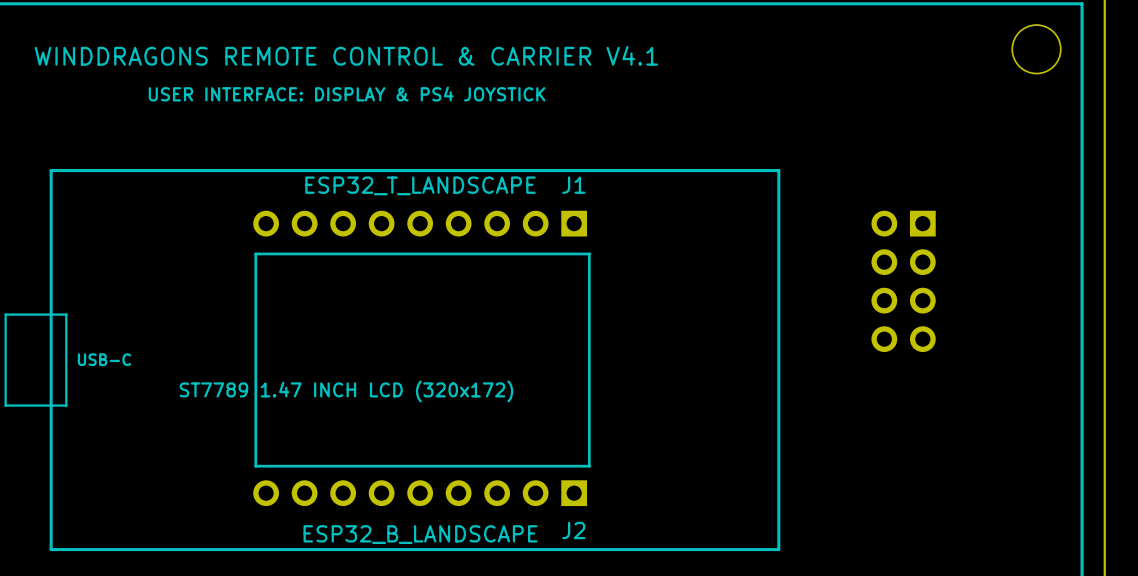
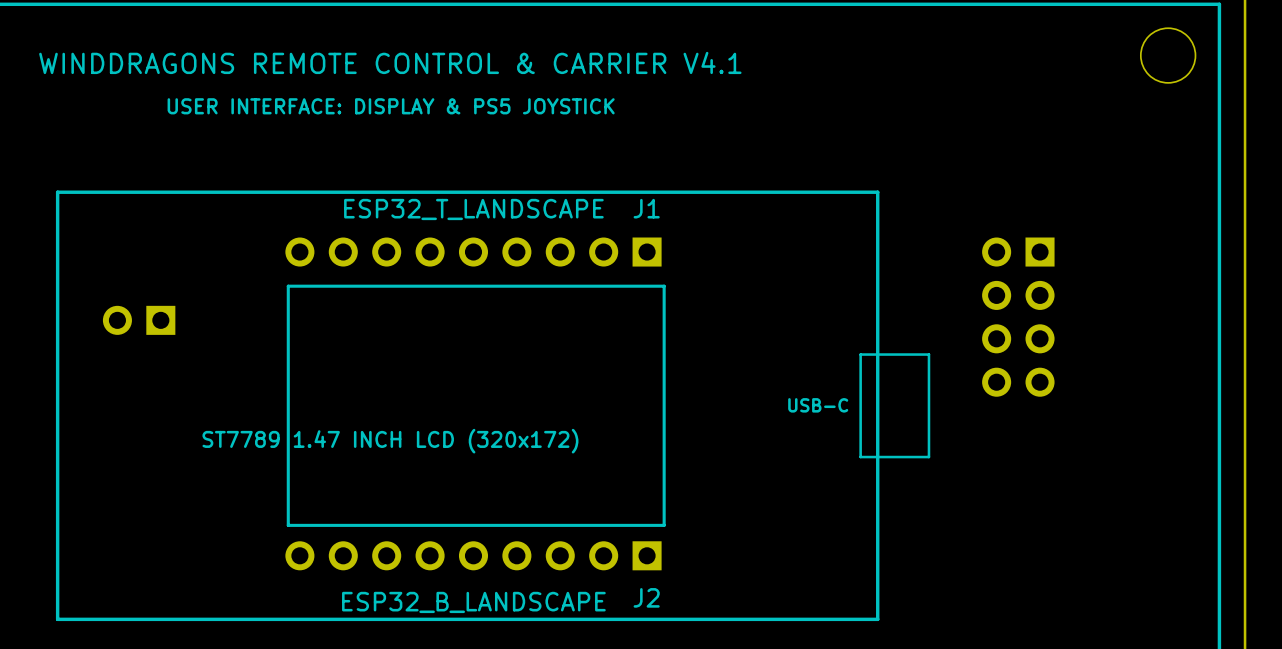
text: USER INTERFACE: DISPLAY & PS4 JOYSTICK (347, 94) -> USER INTERFACE: DISPLAY & PS5 JOYSTICK (391, 106)
part: none -> (139, 320)
line: (66, 314) (5, 314) (5, 405) (66, 405) (66, 314) -> none
line: none -> (928, 354) (860, 354) (860, 457) (928, 457) (928, 354)
text: USB-C (104, 359) -> none
text: none -> USB-C (818, 405)

